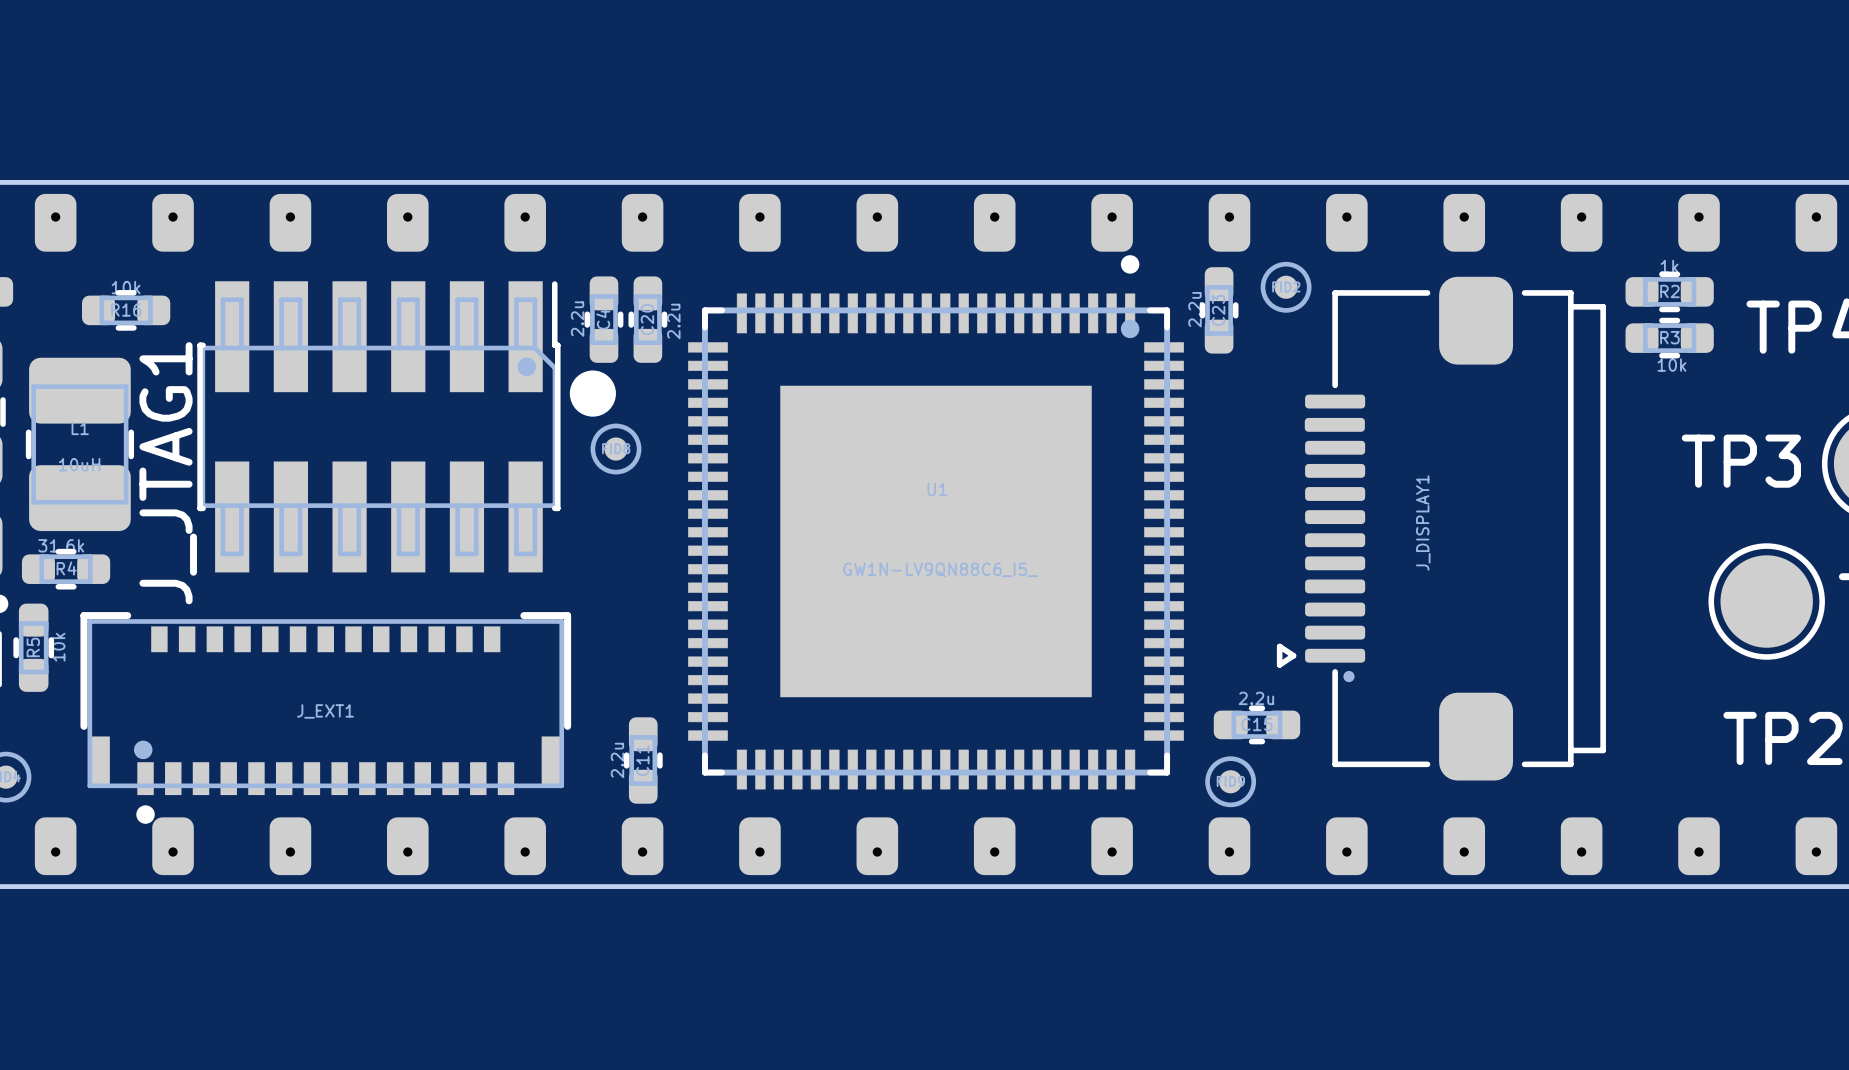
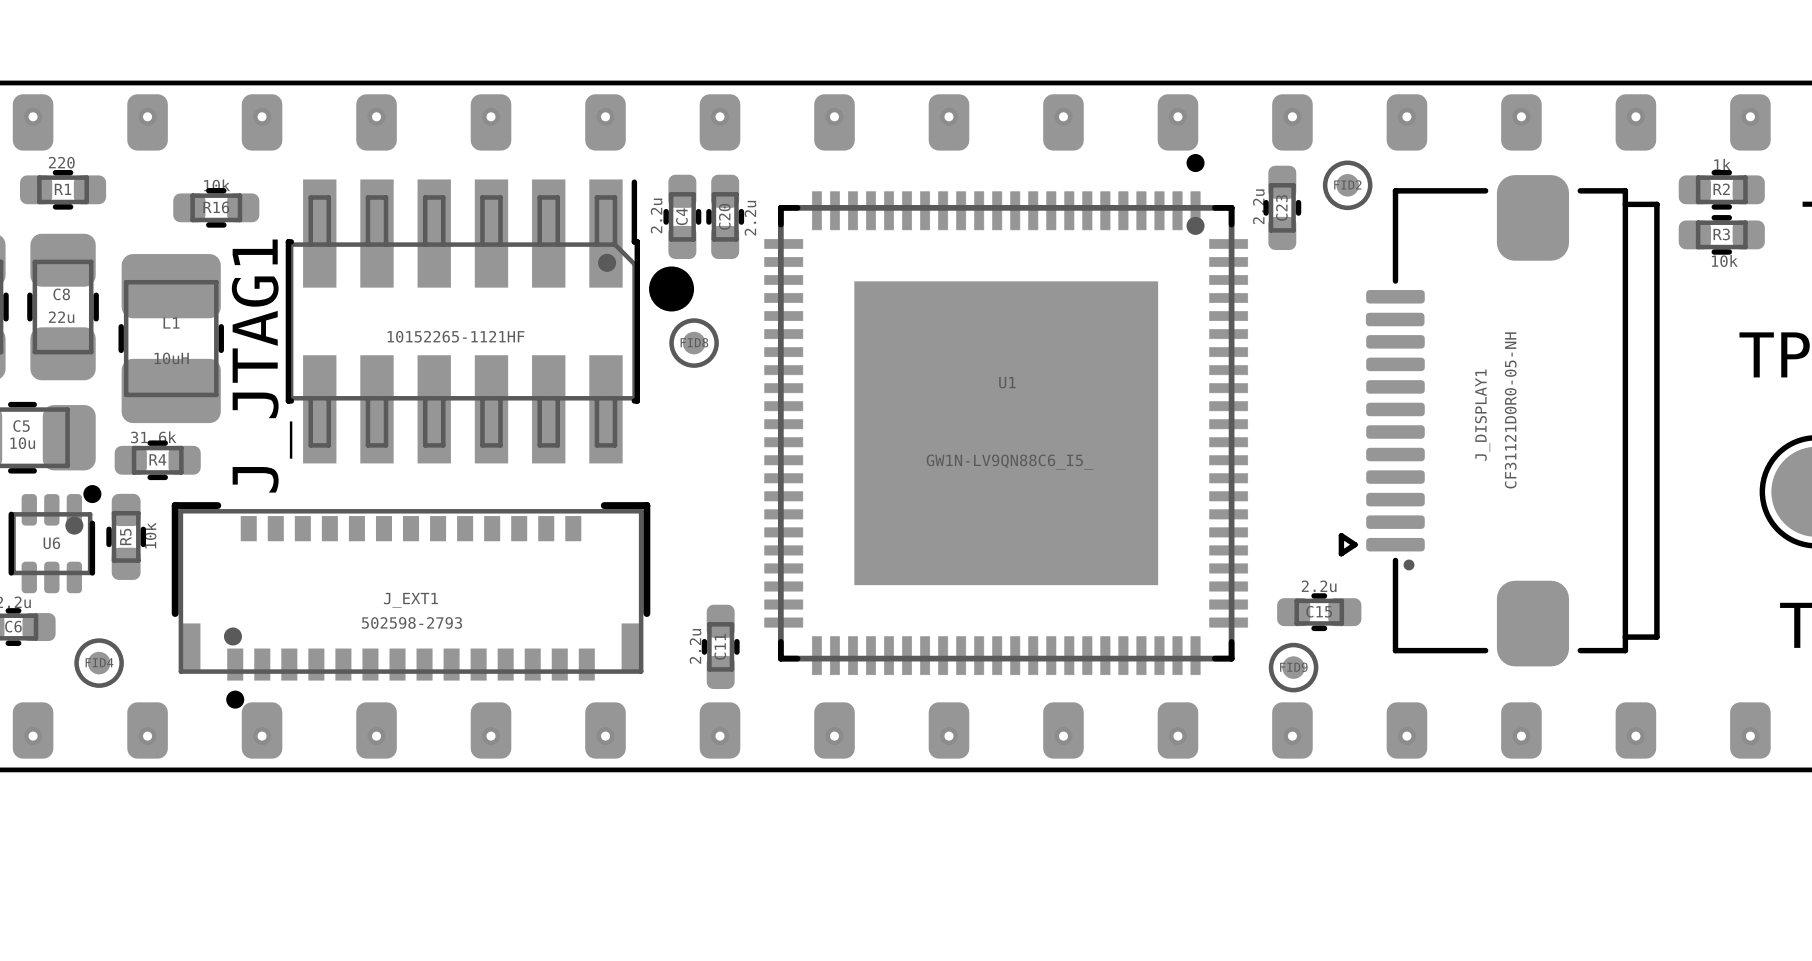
J_JTAG1 text: none -> 10152265-1121HF (456, 336)
J_DISPLAY1 text: none -> CF31121D0R0-05-NH (1510, 410)
J_EXT1 text: none -> 502598-2793 (411, 622)

